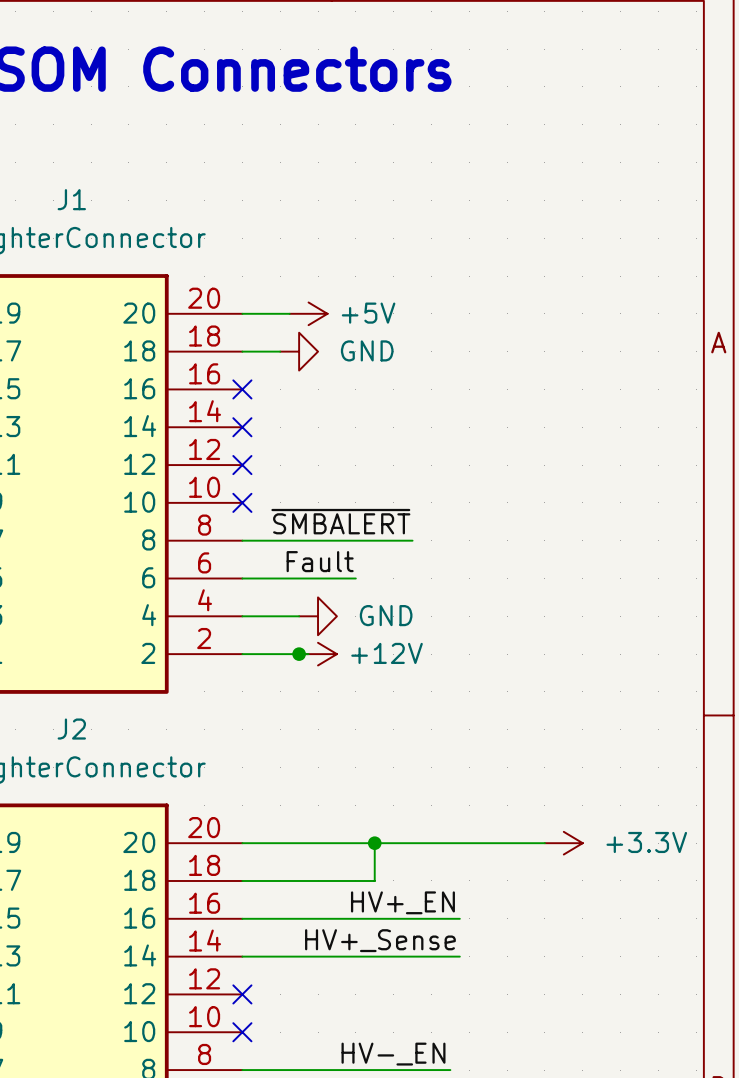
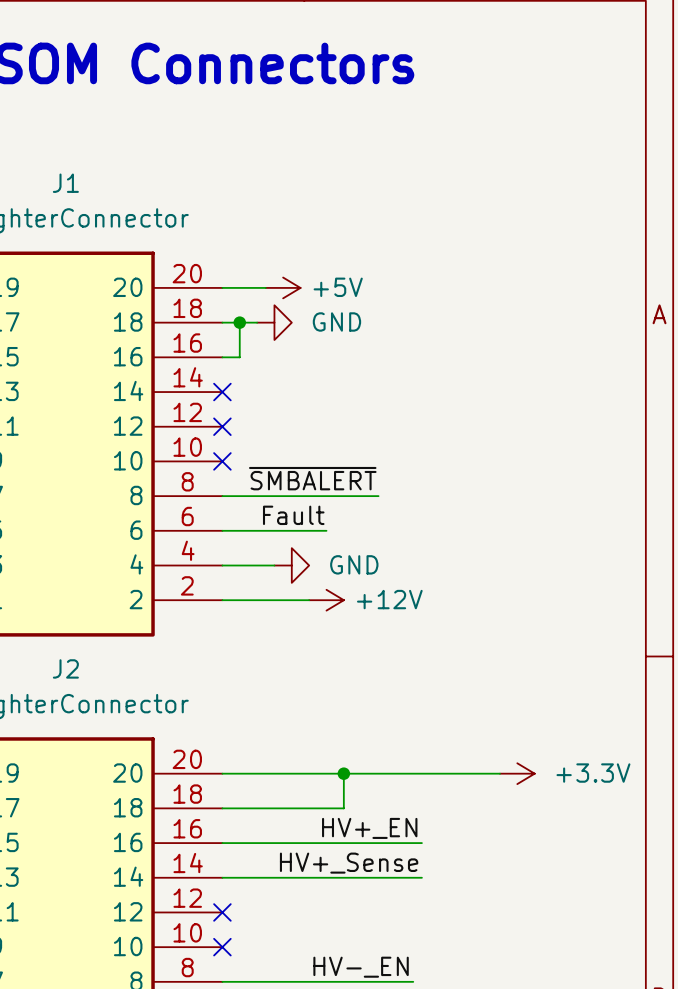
wire: none -> (239, 322) (239, 357) (222, 357)
junction: none -> (239, 322)
no-connect mark: (242, 389) -> none
junction: (299, 654) -> none
power symbol position: +12V (318, 654) -> +12V (326, 600)

